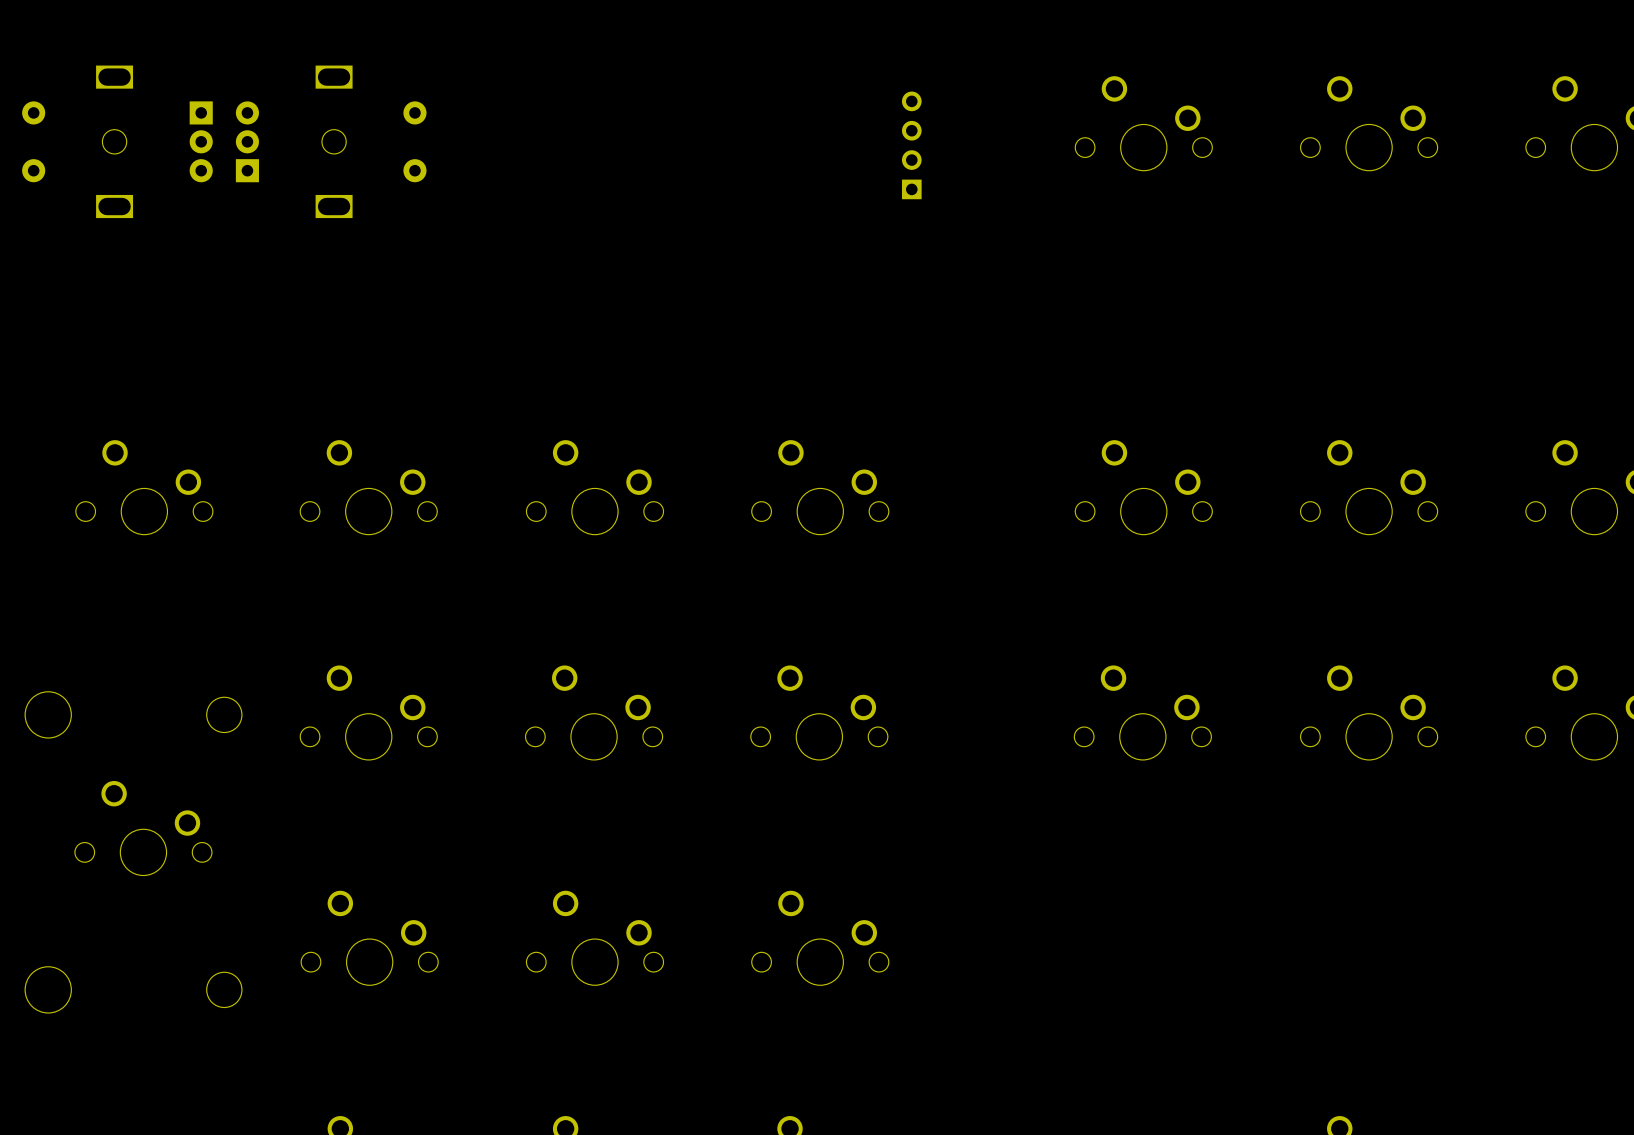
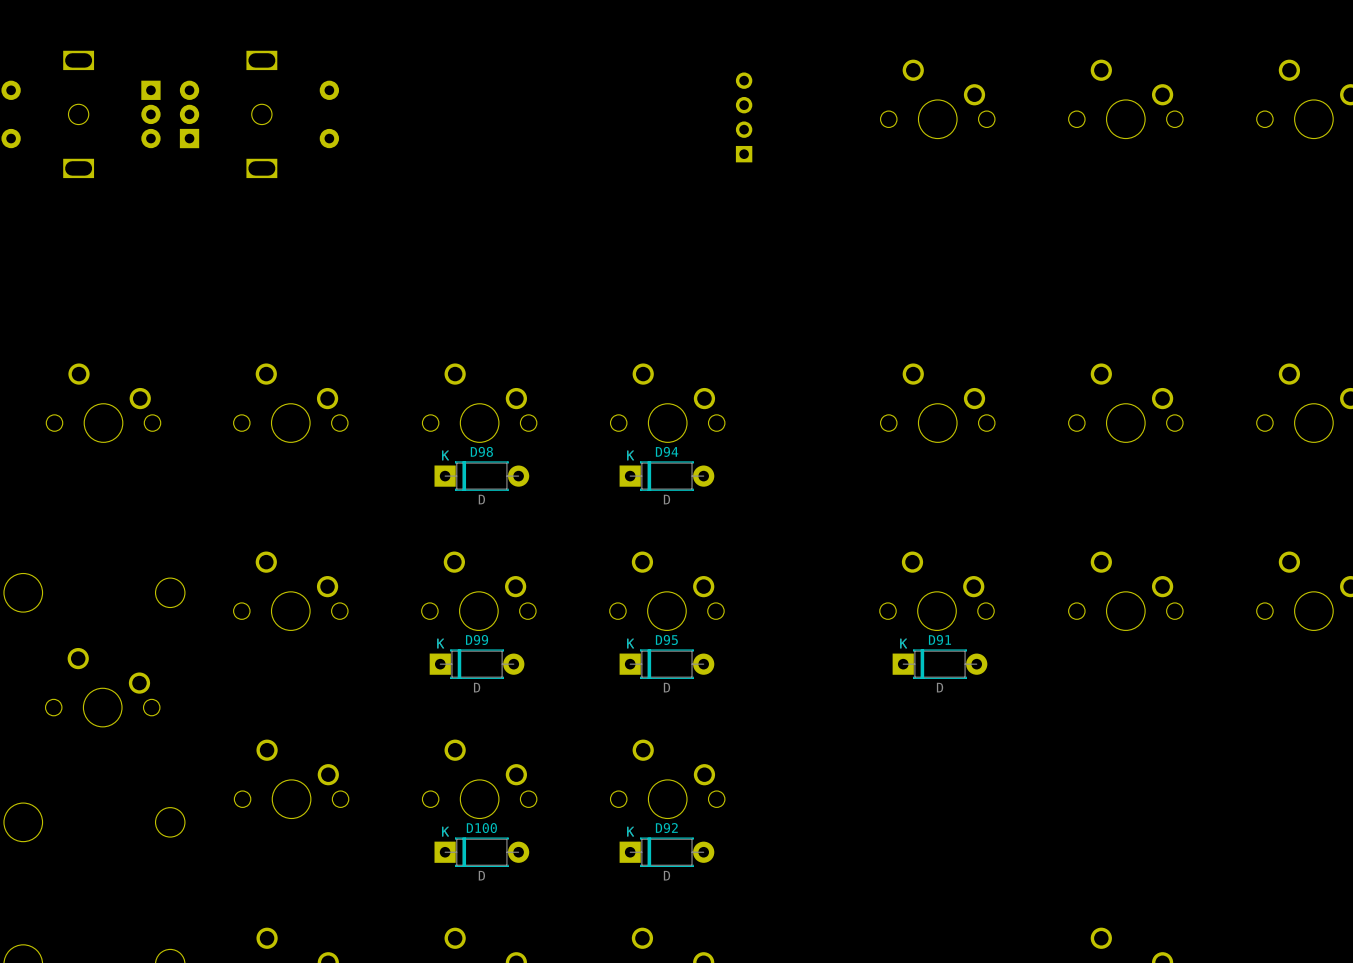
D98: none -> D (481, 476)
D94: none -> D (666, 476)
D99: none -> D (477, 664)
D95: none -> D (666, 664)
D91: none -> D (939, 664)
D100: none -> D (481, 852)
D92: none -> D (666, 852)

